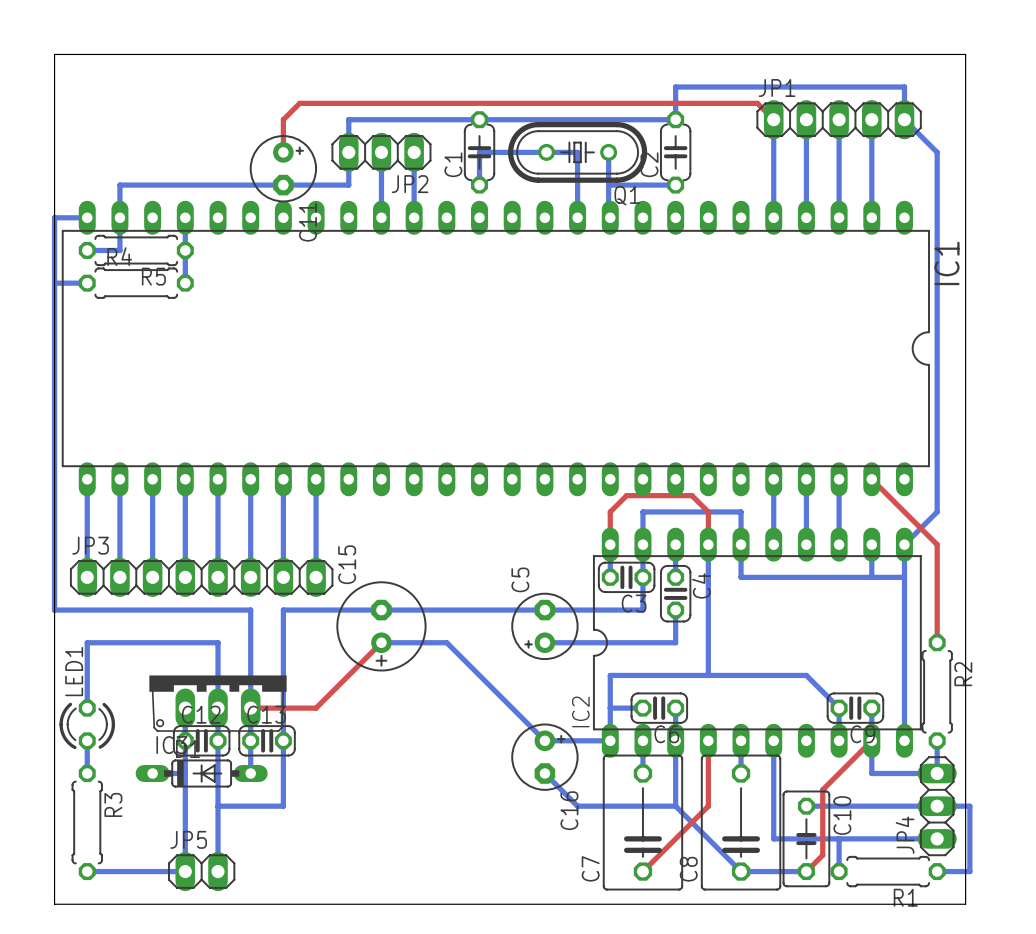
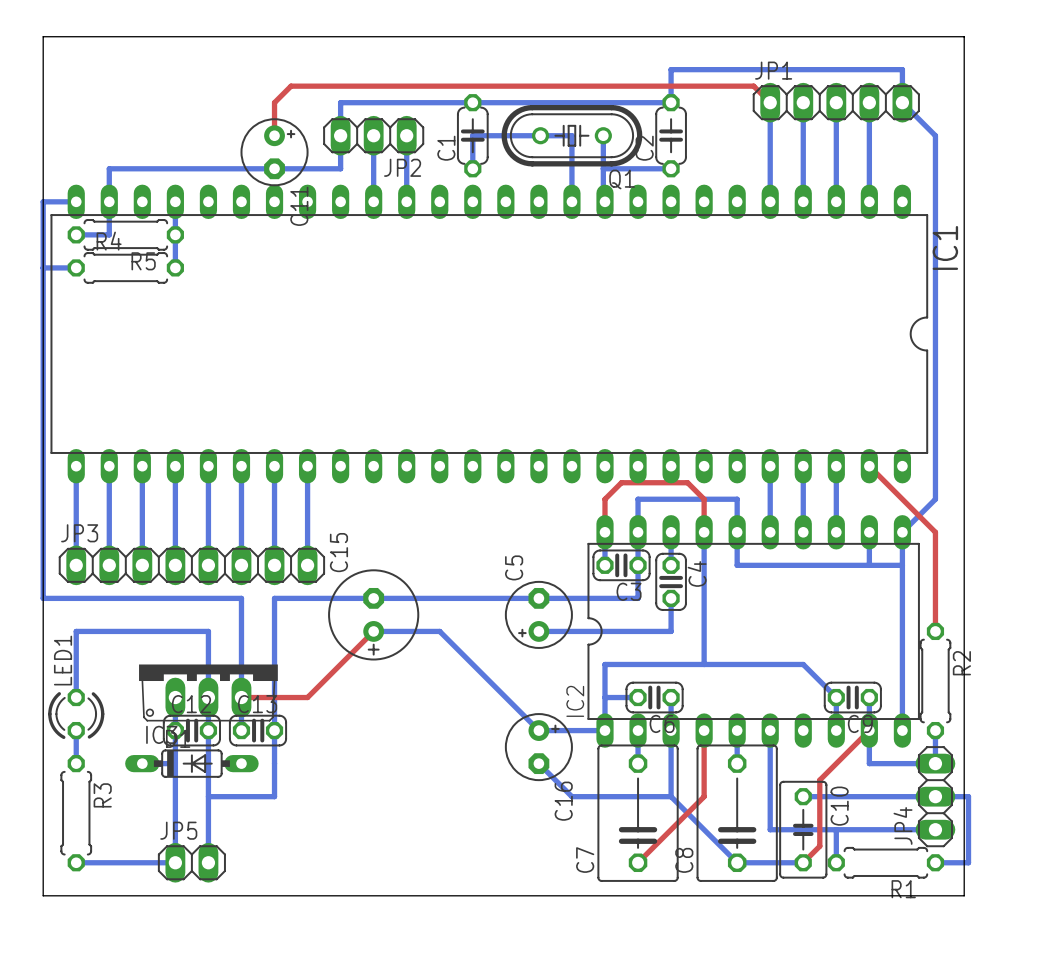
bottom track: (250, 740) (250, 773) -> none

